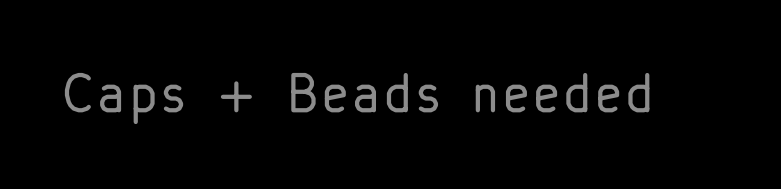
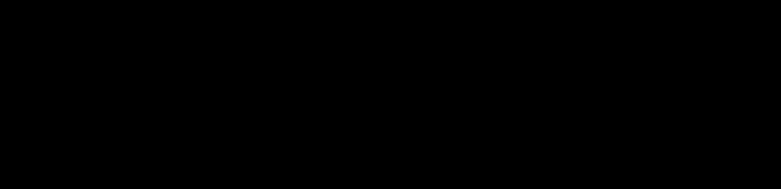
text: Caps + Beads needed (357, 98) -> none

